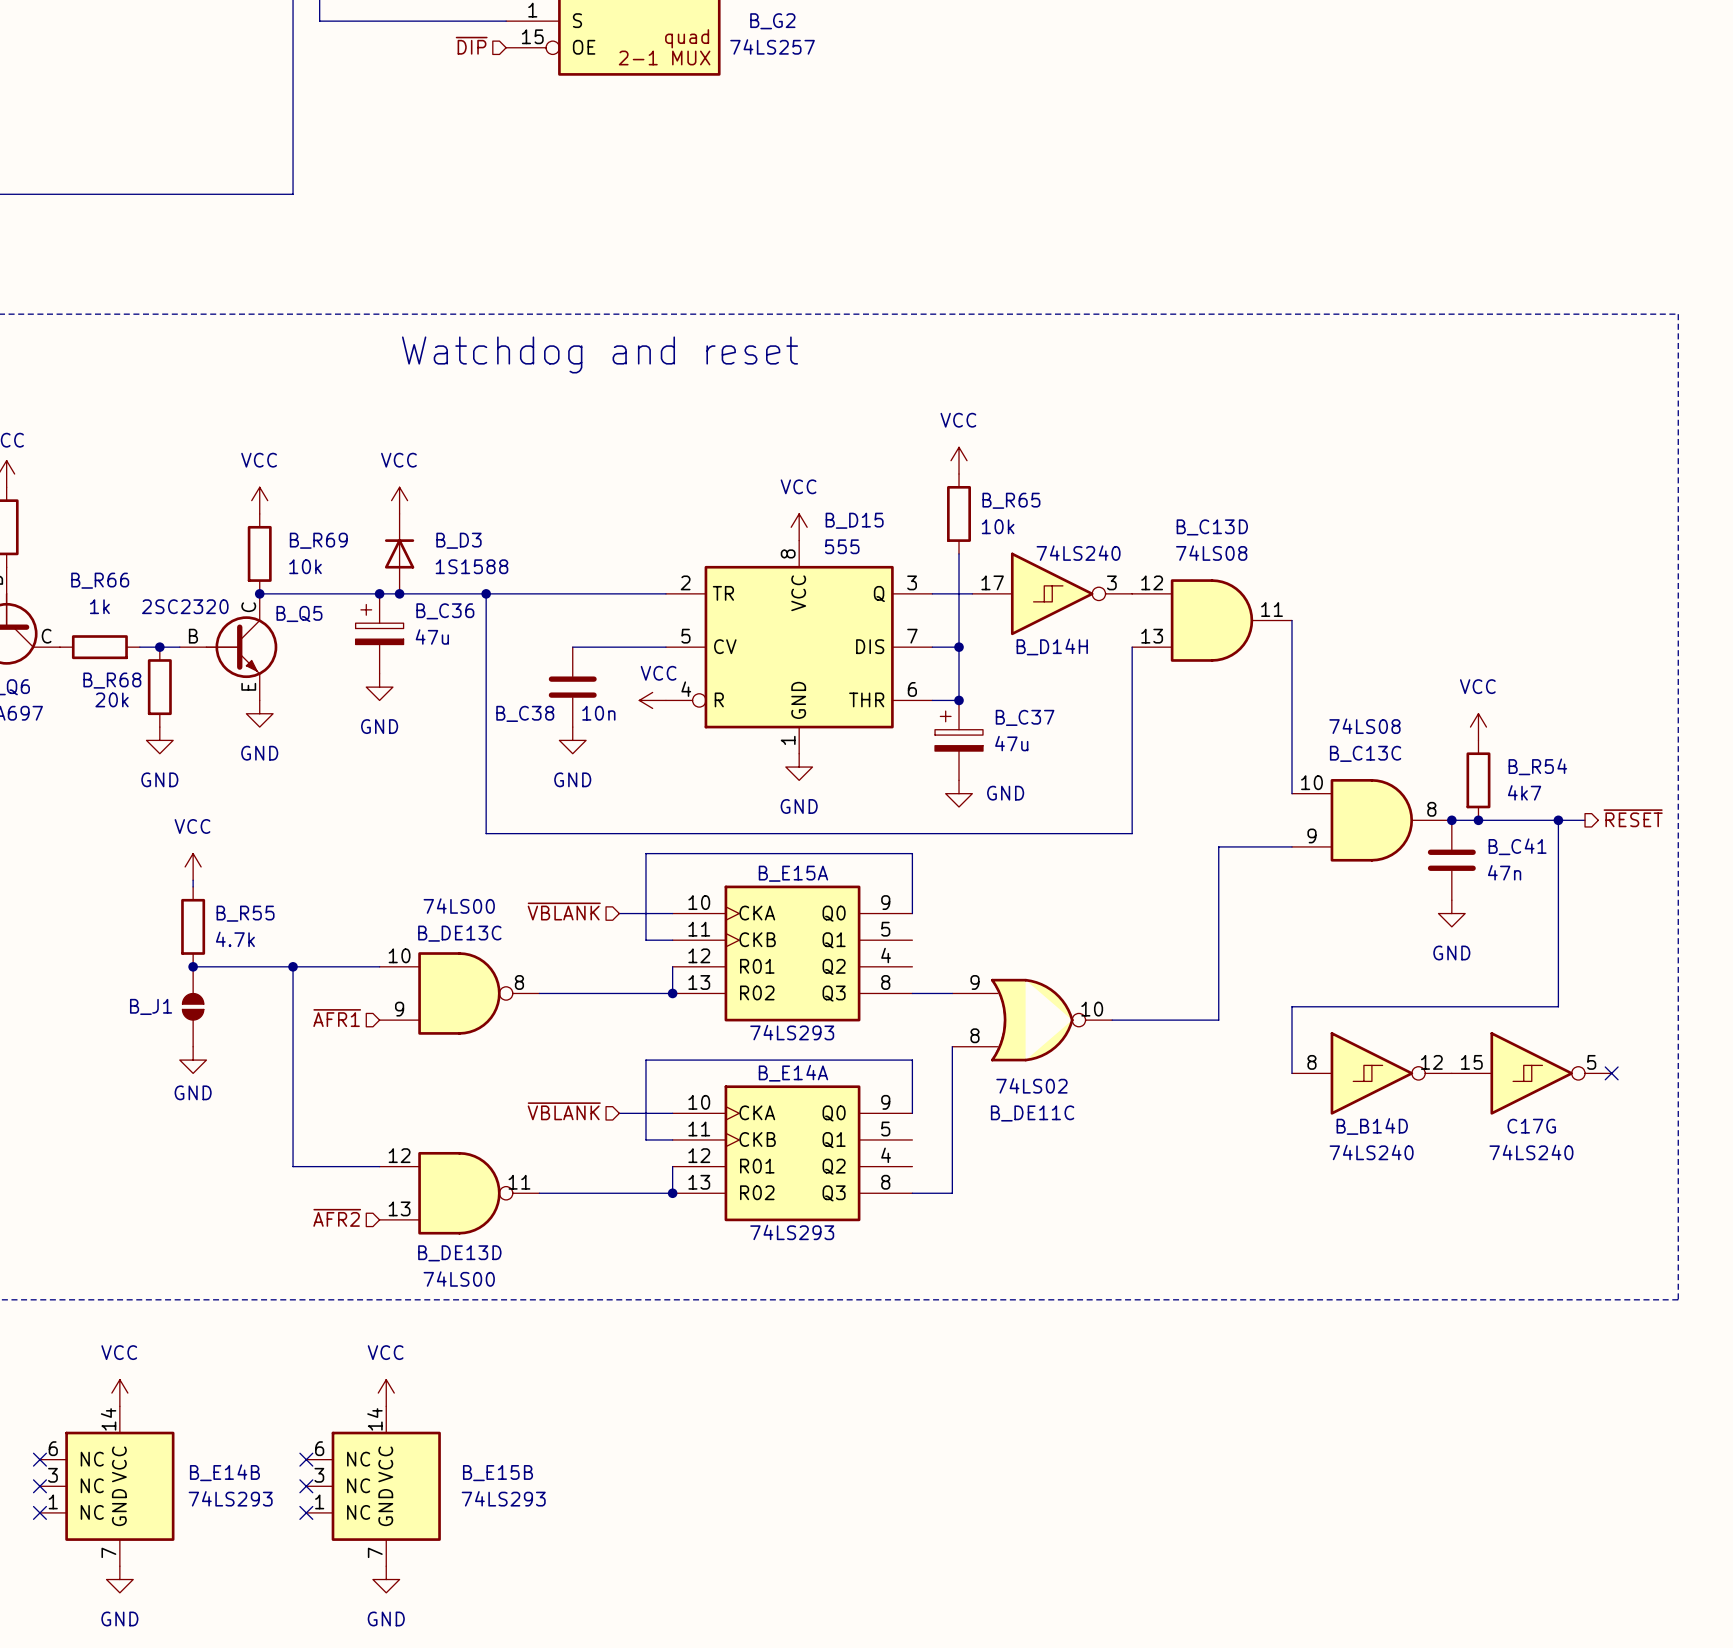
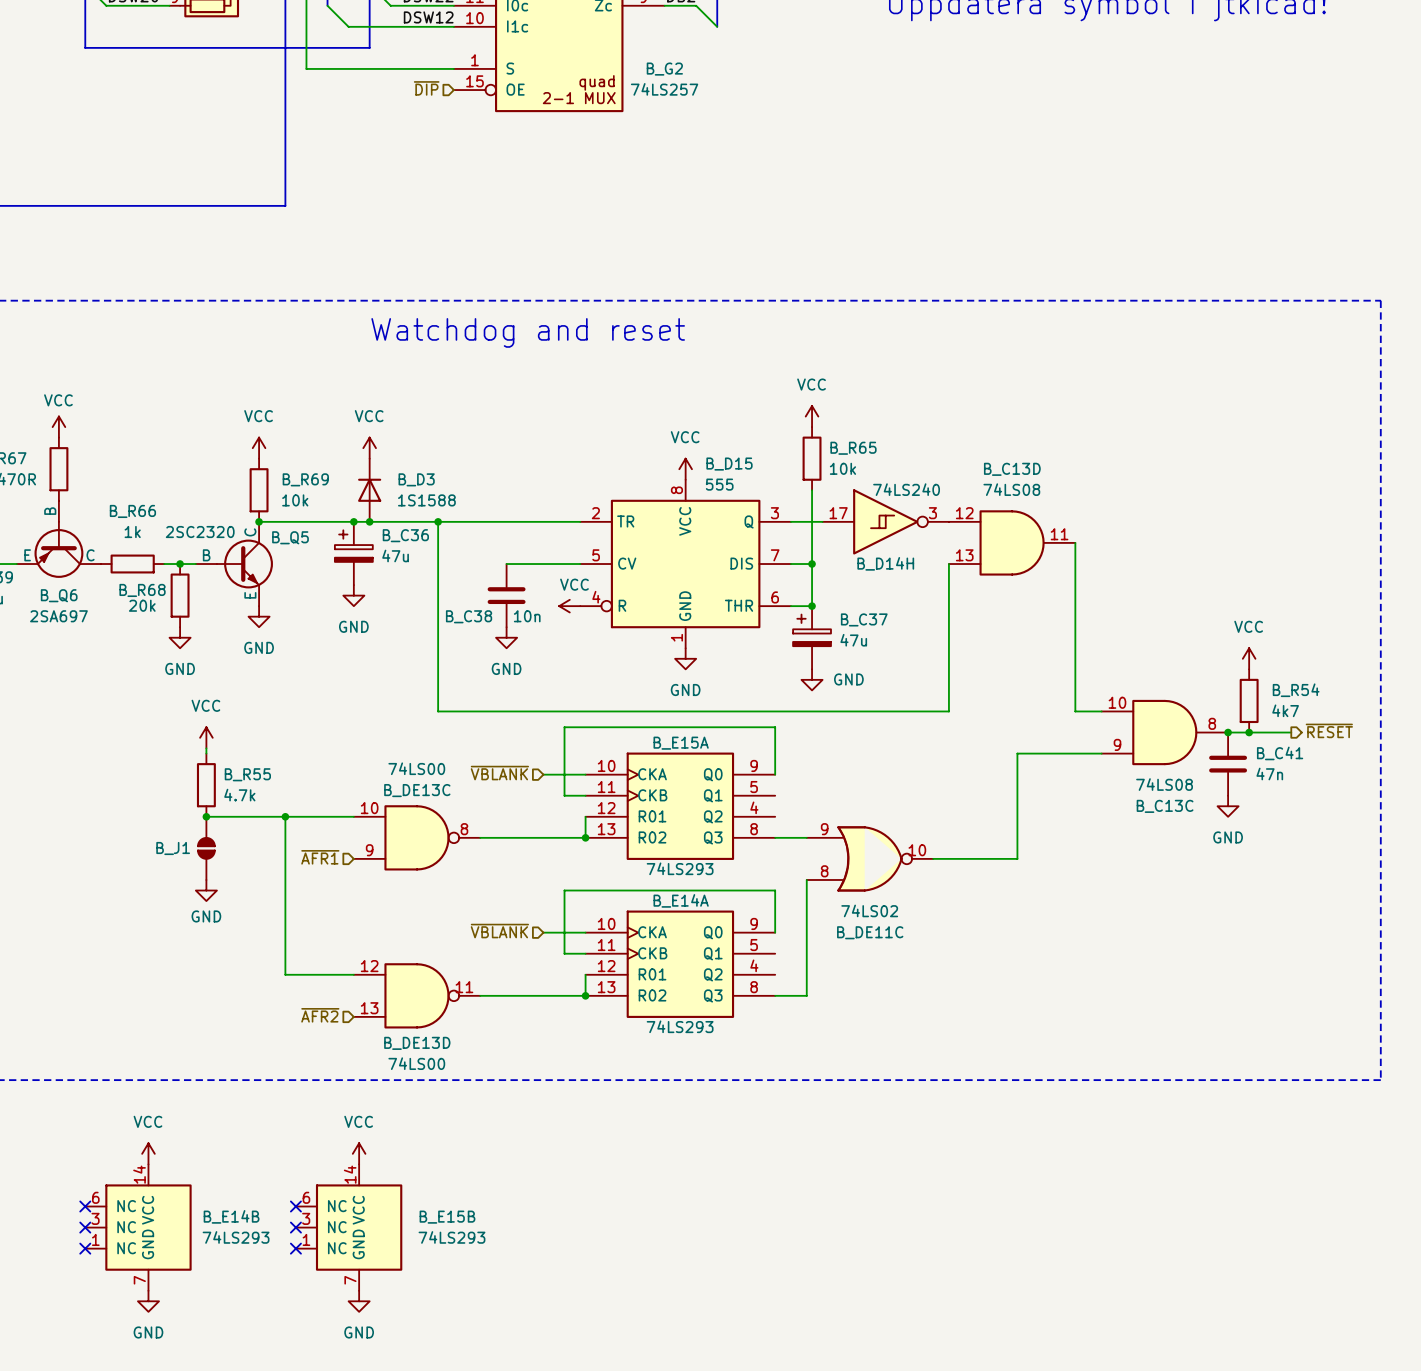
B_C13C value position: 74LS08 (1364, 726) -> 74LS08 (1164, 784)
power symbol position: VCC (1478, 727) -> VCC (1249, 658)
B_C13C name position: B_C13C (1365, 753) -> B_C13C (1165, 806)
B_R54 position: (1478, 780) -> (1249, 700)
wire: none -> (1075, 679) (1075, 711) (1101, 711)
hierarchical label position: ~{RESET} (1633, 818) -> ~{RESET} (1329, 730)
B_C13C position: (1371, 820) -> (1164, 732)
wire: (1451, 820) (1585, 820) -> none
junction: (1451, 820) -> none
junction: (1478, 820) -> none
wire: (1558, 820) (1558, 1006) (1292, 1006) (1292, 1073) -> none
junction: (1558, 820) -> none
wire: (1292, 846) (1218, 846) (1218, 886) -> (1101, 753) (1017, 753)
B_C41 position: (1451, 860) -> (1228, 764)
wire: none -> (1228, 732) (1291, 732)
junction: none -> (1228, 732)
junction: none -> (1249, 732)
power symbol position: GND (1451, 913) -> GND (1228, 806)
B_B14D: 74LS240 (1371, 1073) -> none
C17G: 74LS240 (1531, 1073) -> none
no-connect mark: (1611, 1073) -> none

